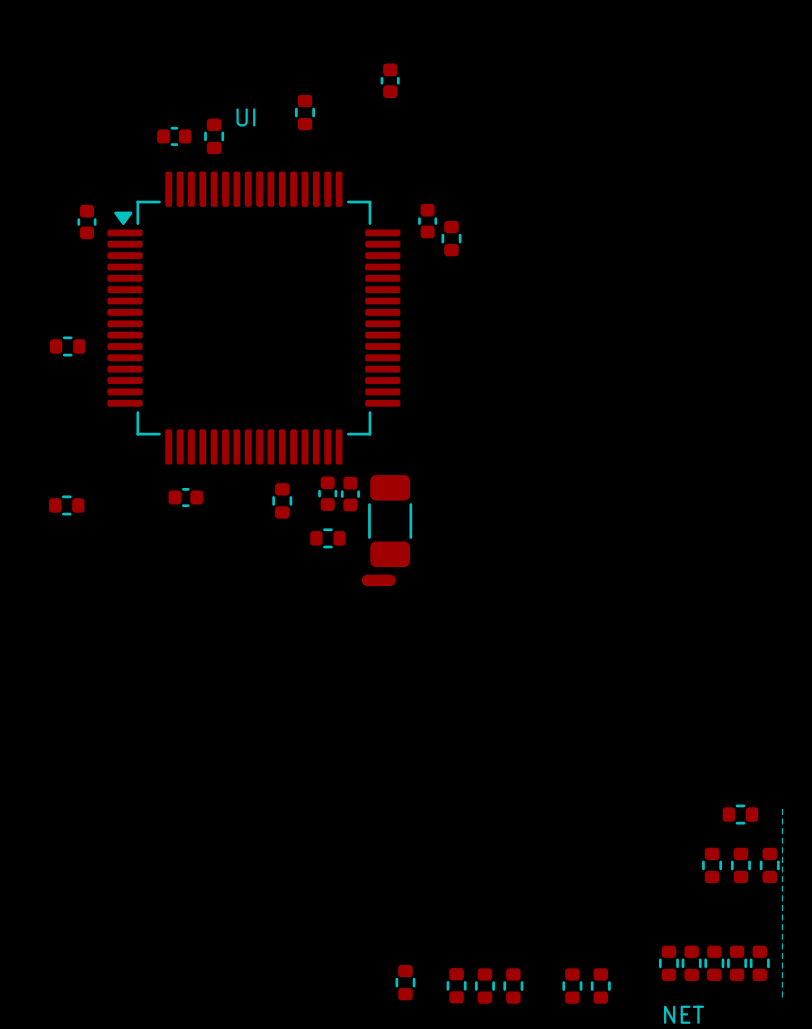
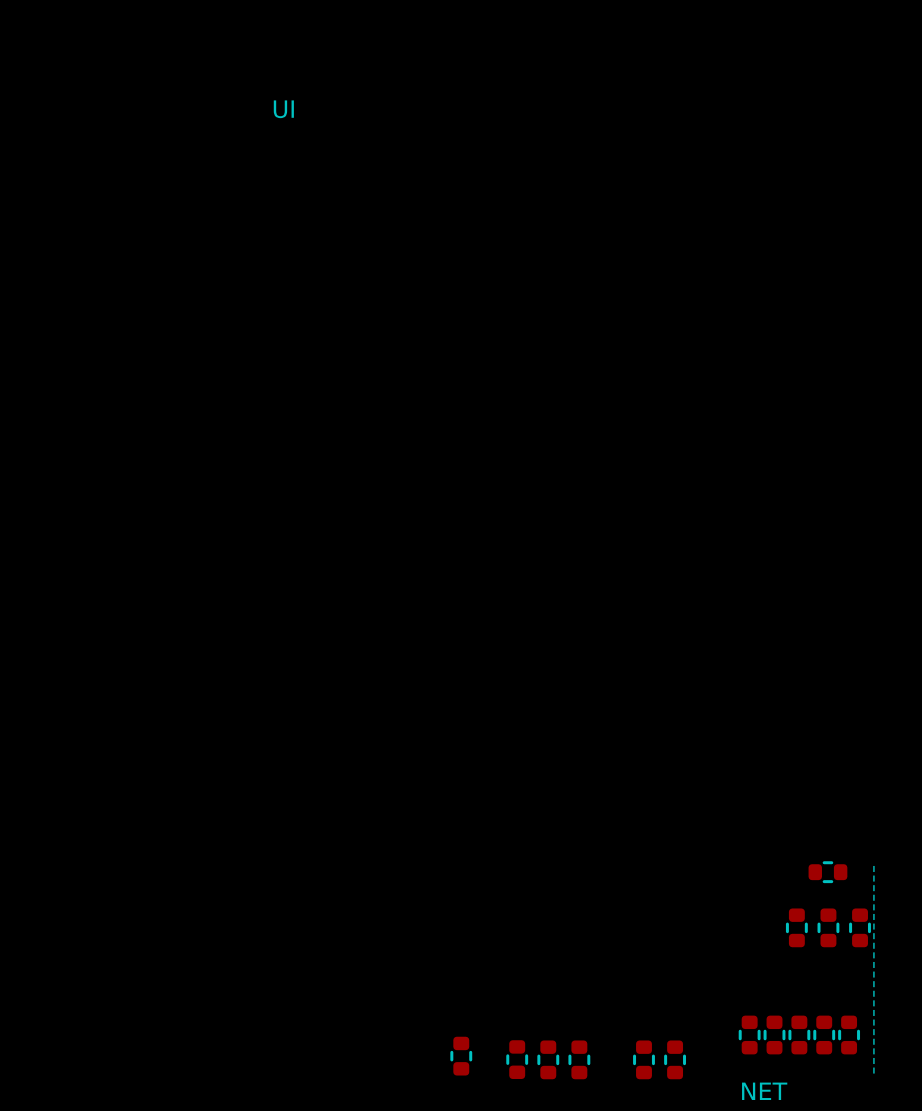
part: (390, 80) -> none
part: (304, 112) -> none
part: (174, 136) -> none
part: (214, 136) -> none
part: (427, 221) -> none
part: (86, 222) -> none
part: (451, 238) -> none
part: (253, 318) -> none
part: (67, 346) -> none
part: (327, 493) -> none
part: (350, 494) -> none
part: (185, 497) -> none
part: (282, 500) -> none
part: (66, 505) -> none
part: (390, 521) -> none
part: (327, 538) -> none
part: (378, 580) -> none

